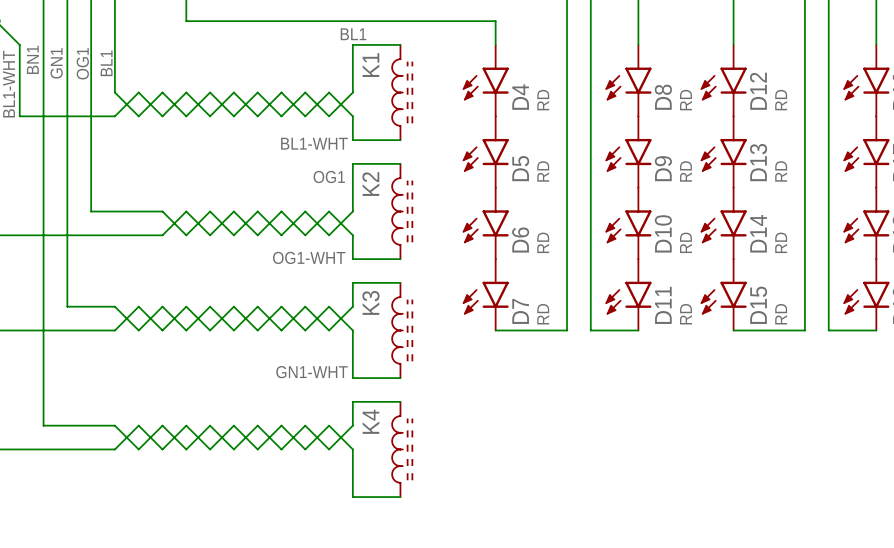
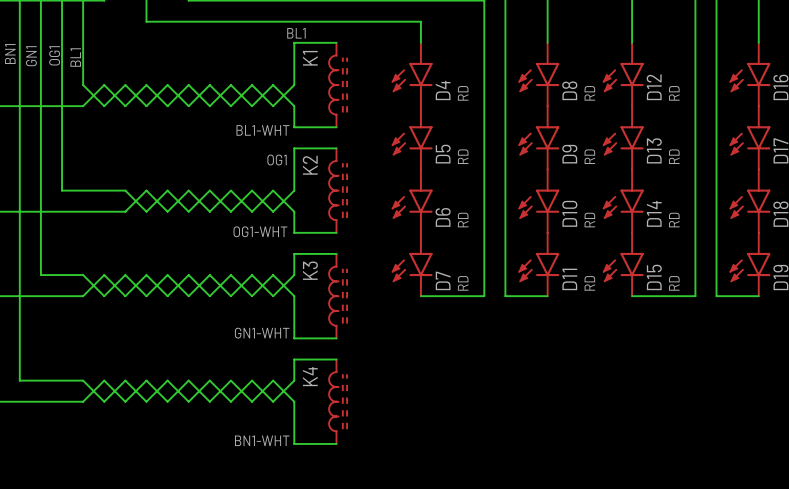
label: none -> BN1-WHT (262, 440)

